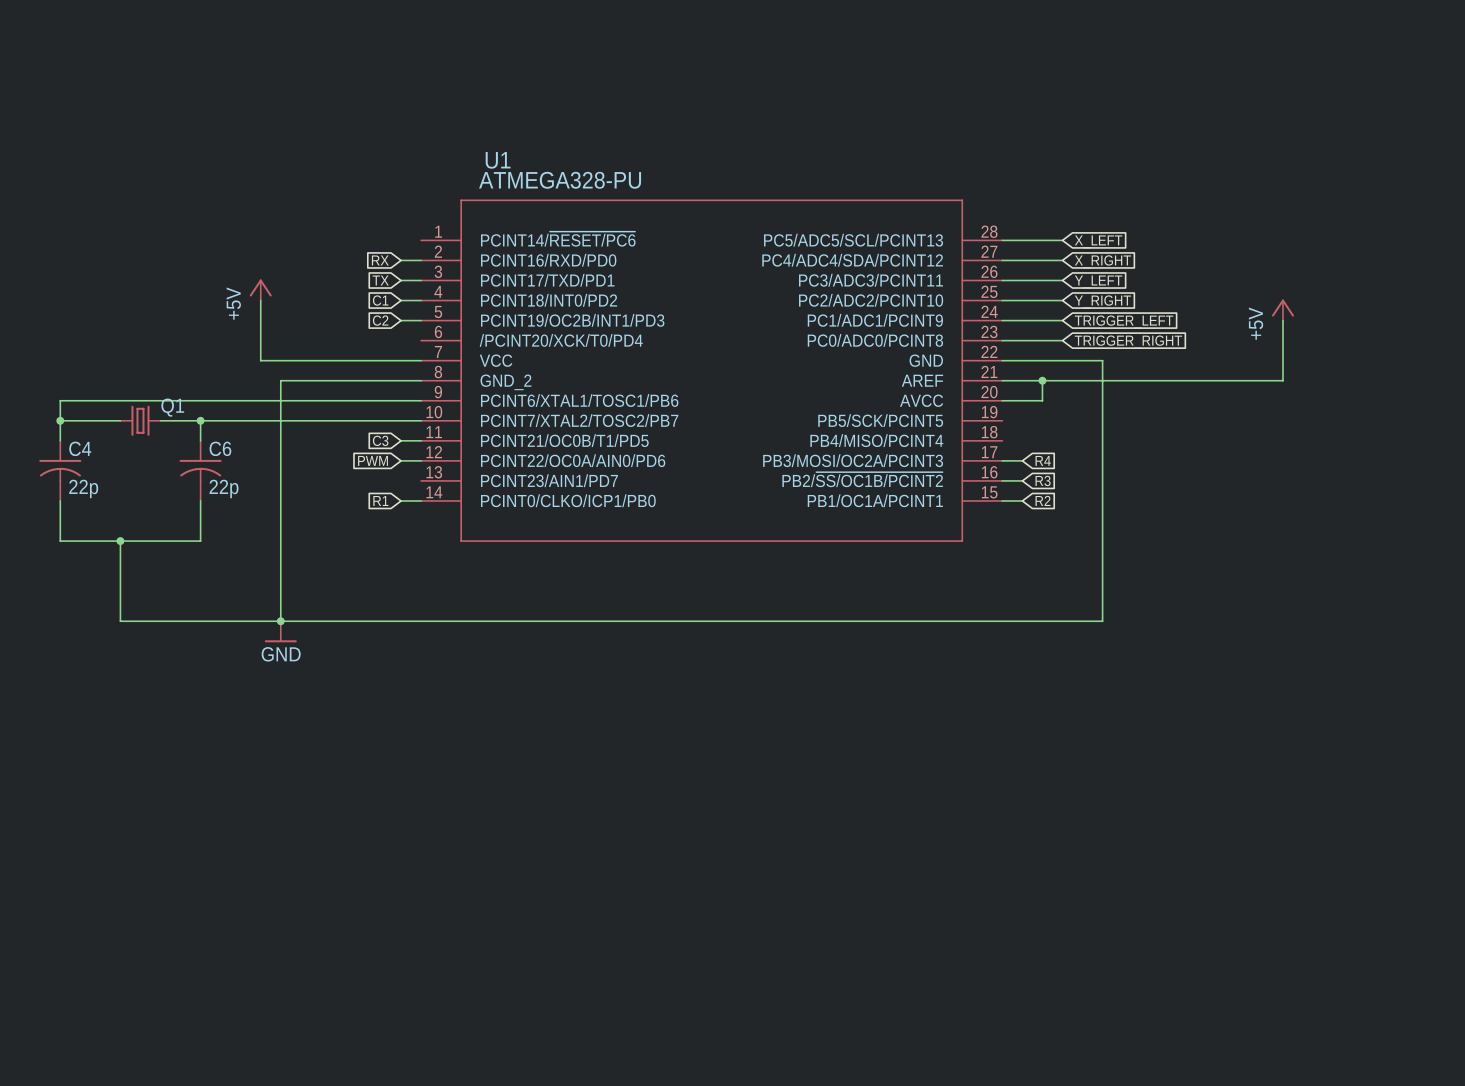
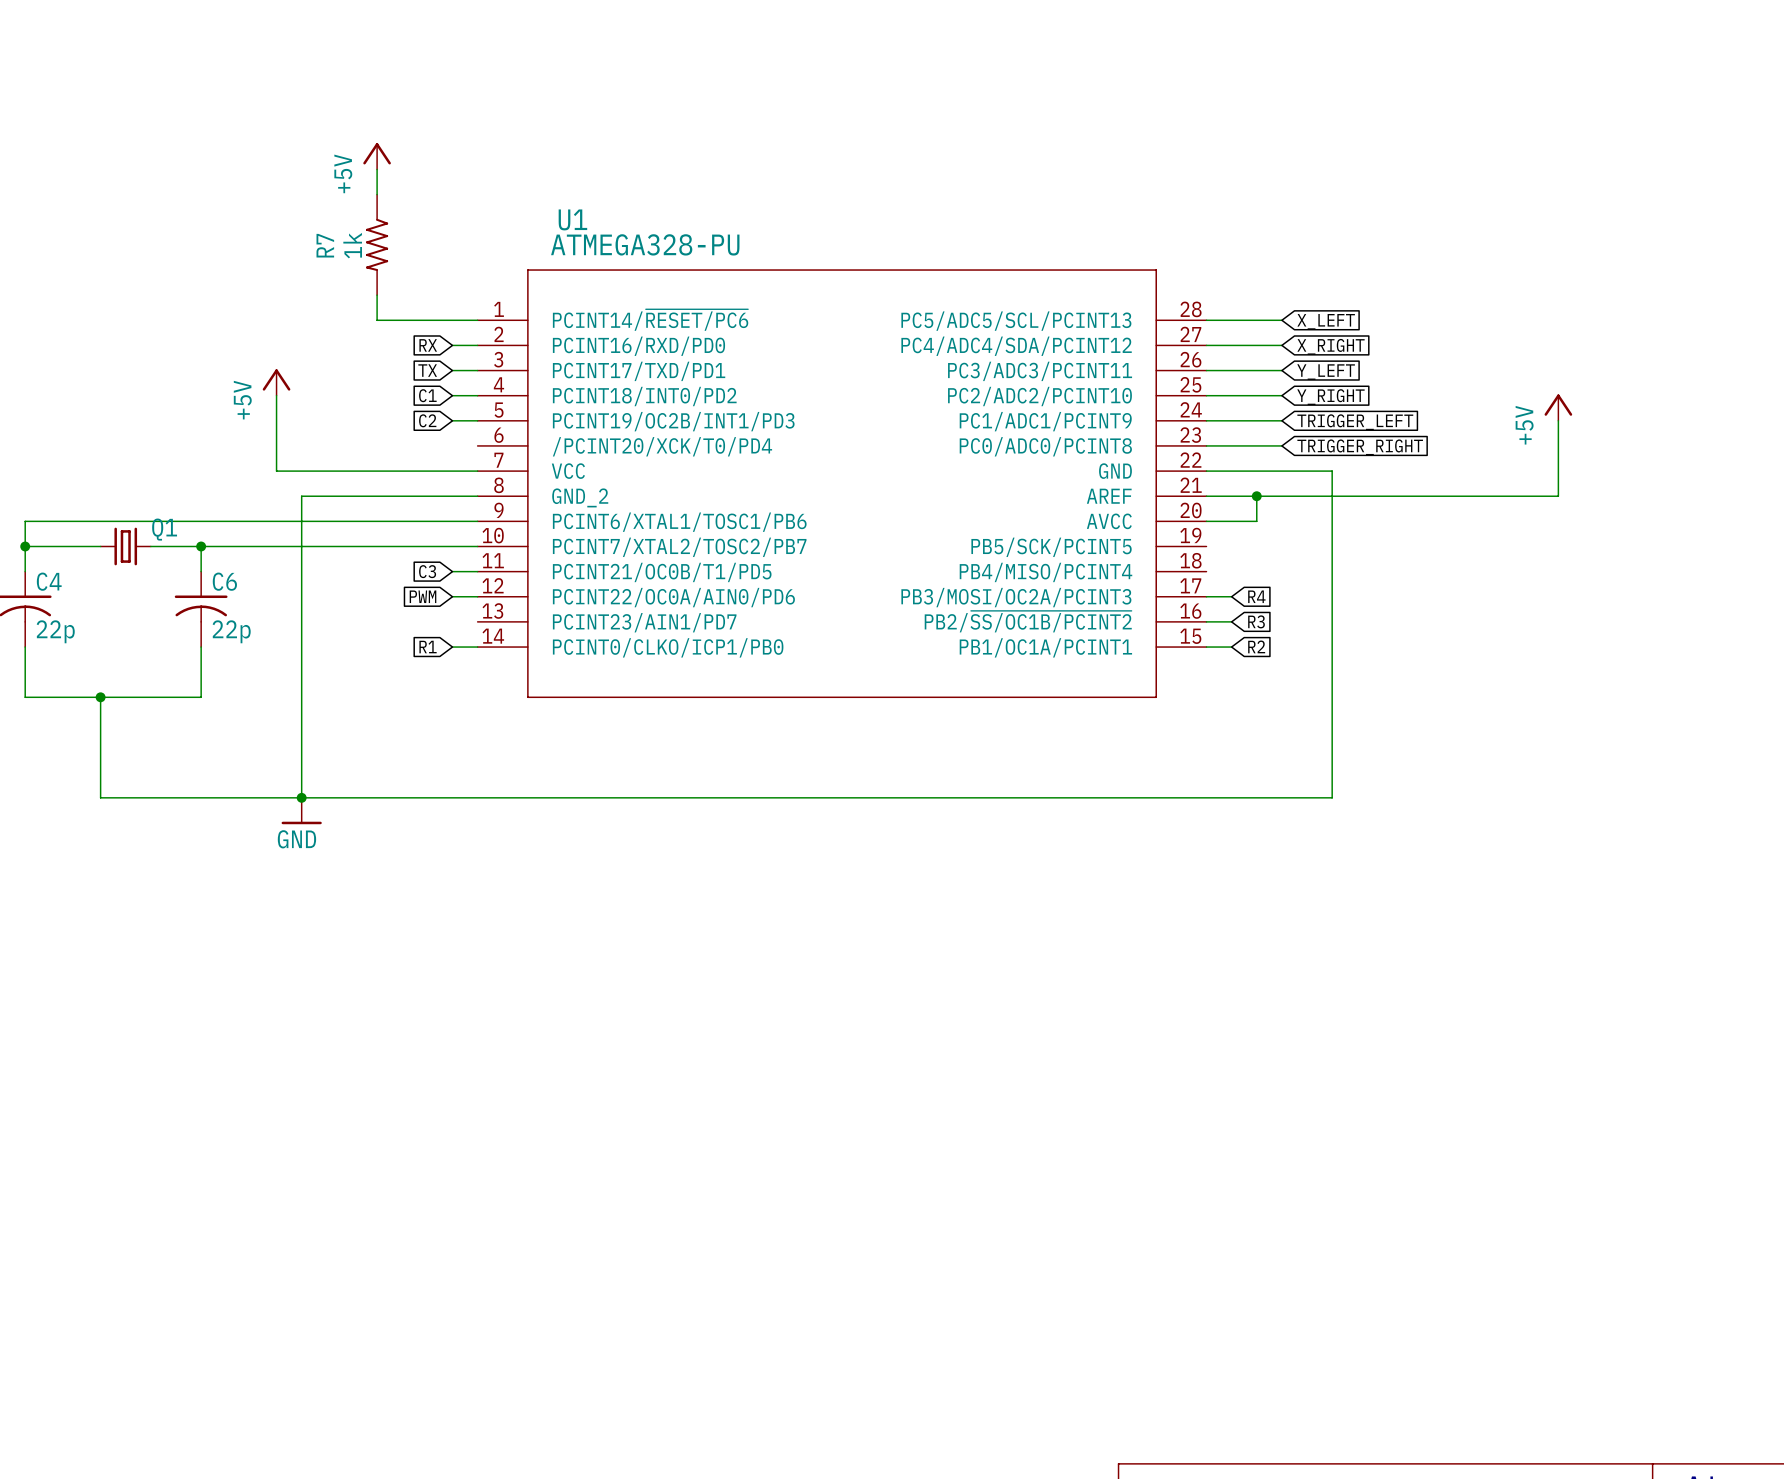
power symbol: none -> +5V (377, 156)
wire: none -> (377, 169) (377, 194)
R7: none -> 1k (377, 244)
wire: none -> (377, 295) (377, 320) (477, 320)

